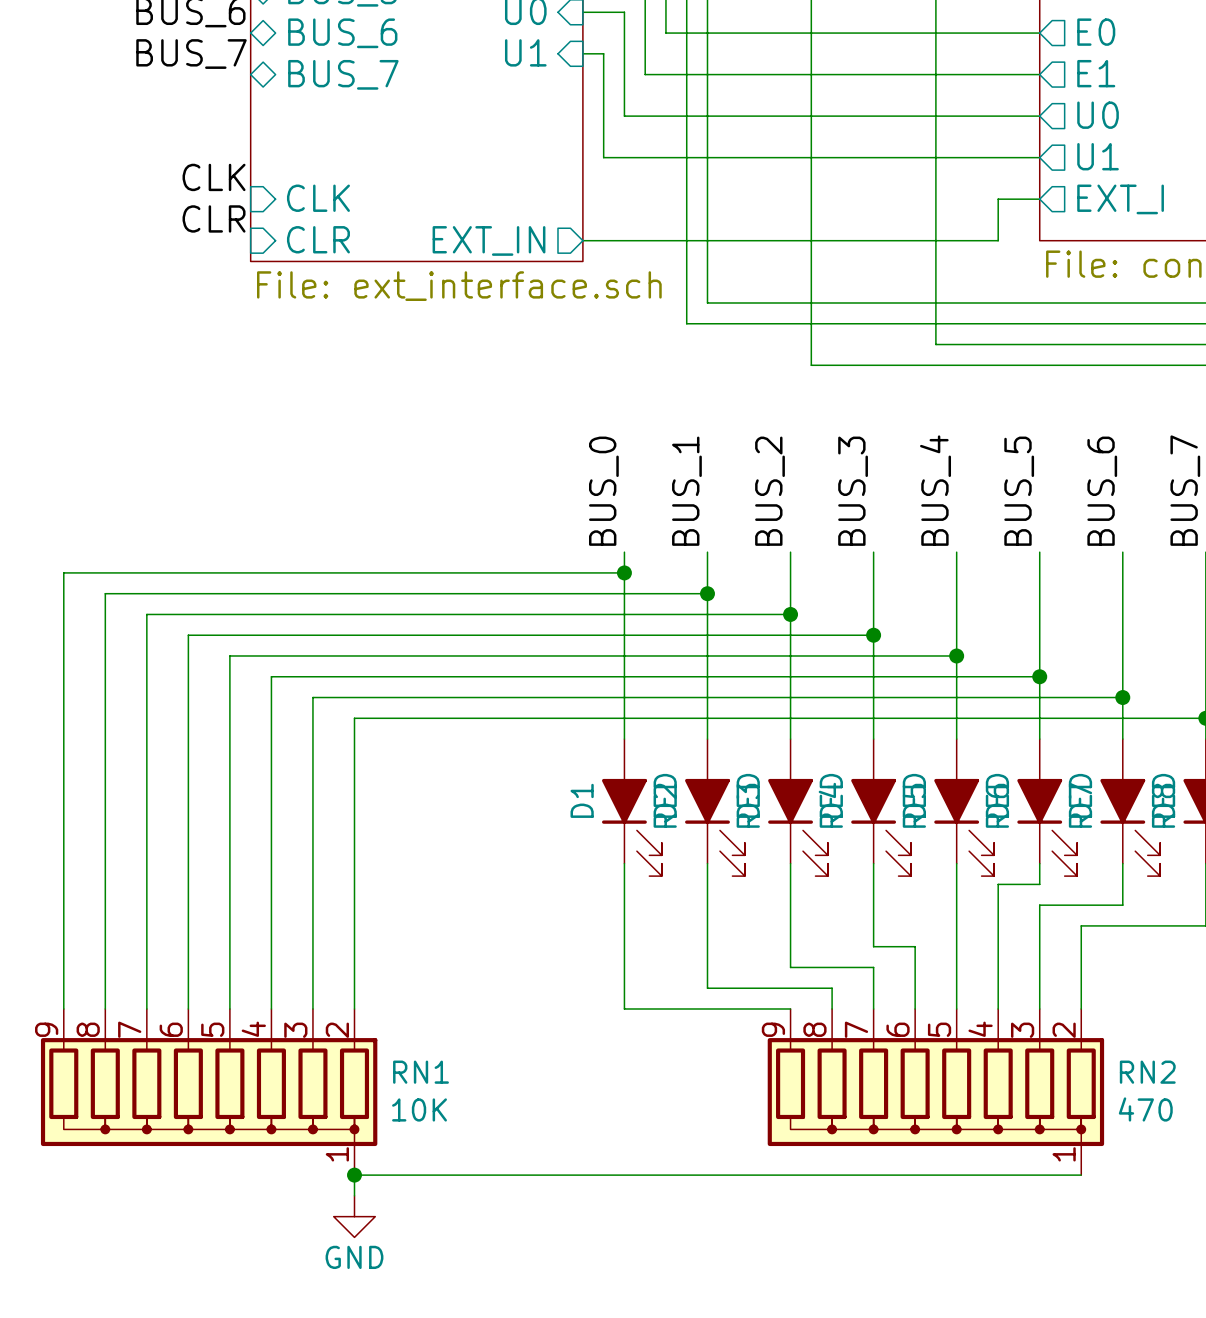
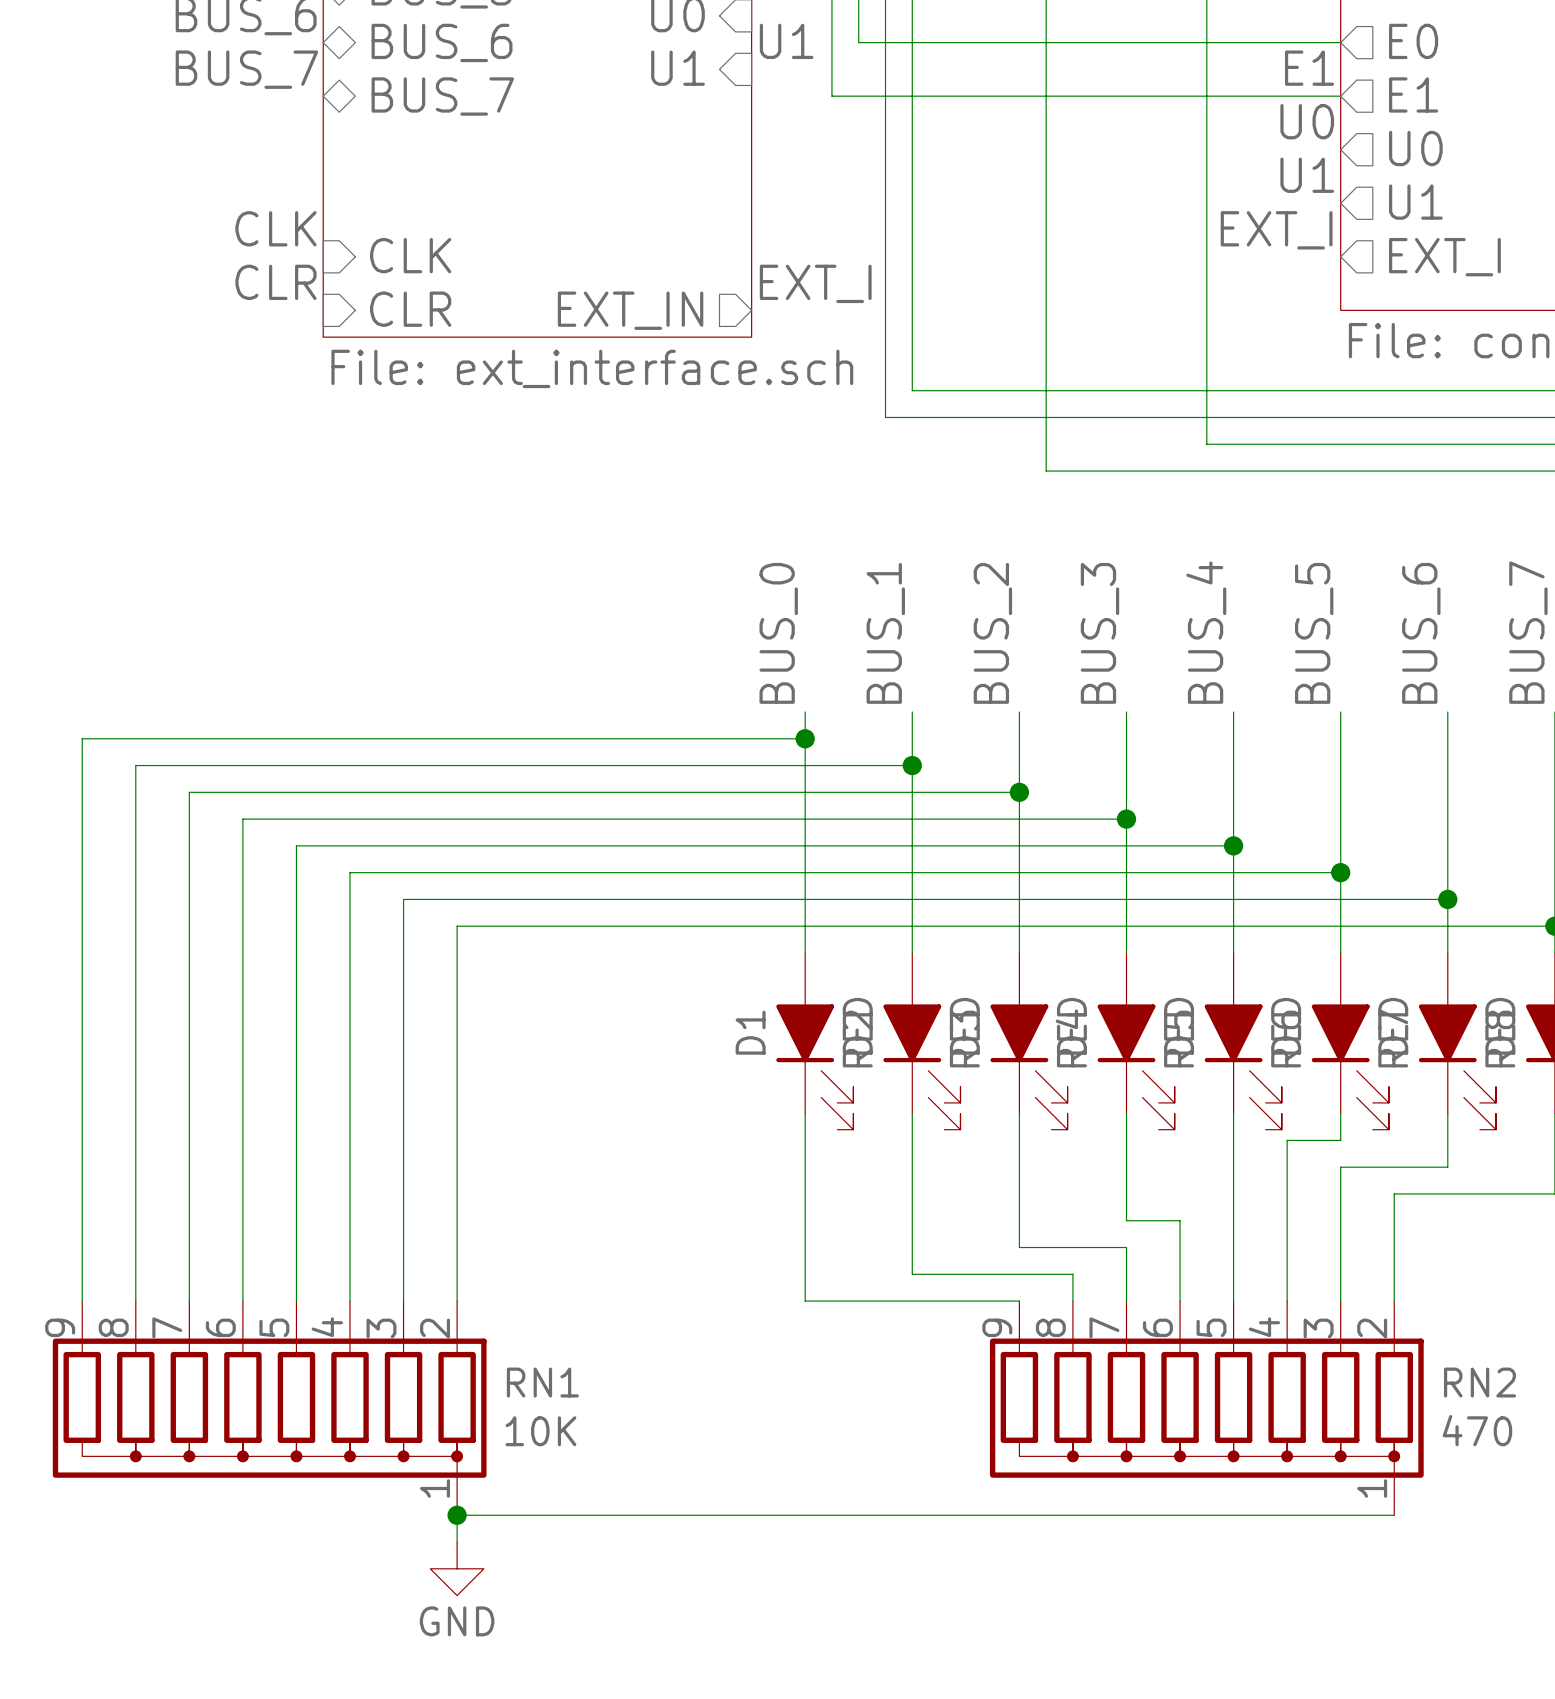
wire: (582, 12) (624, 12) (624, 116) (1039, 116) -> none
label: none -> U1 (786, 41)
label: none -> E1 (1309, 68)
wire: (582, 53) (603, 53) (603, 157) (1039, 157) -> none
label: none -> U0 (1307, 121)
label: none -> U1 (1307, 175)
label: none -> EXT_I (1276, 230)
wire: (1039, 199) (998, 199) (998, 240) (582, 240) -> none
label: none -> EXT_I (815, 283)

